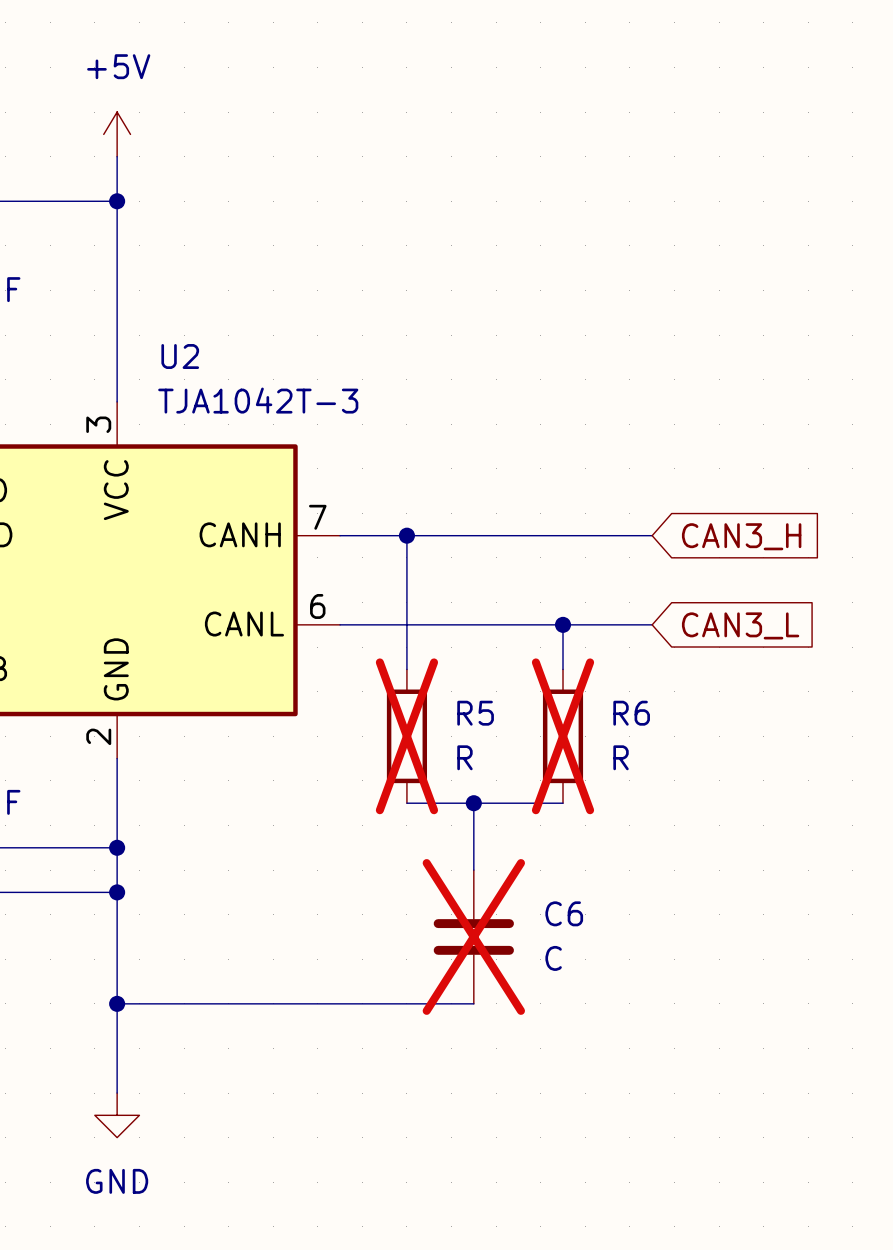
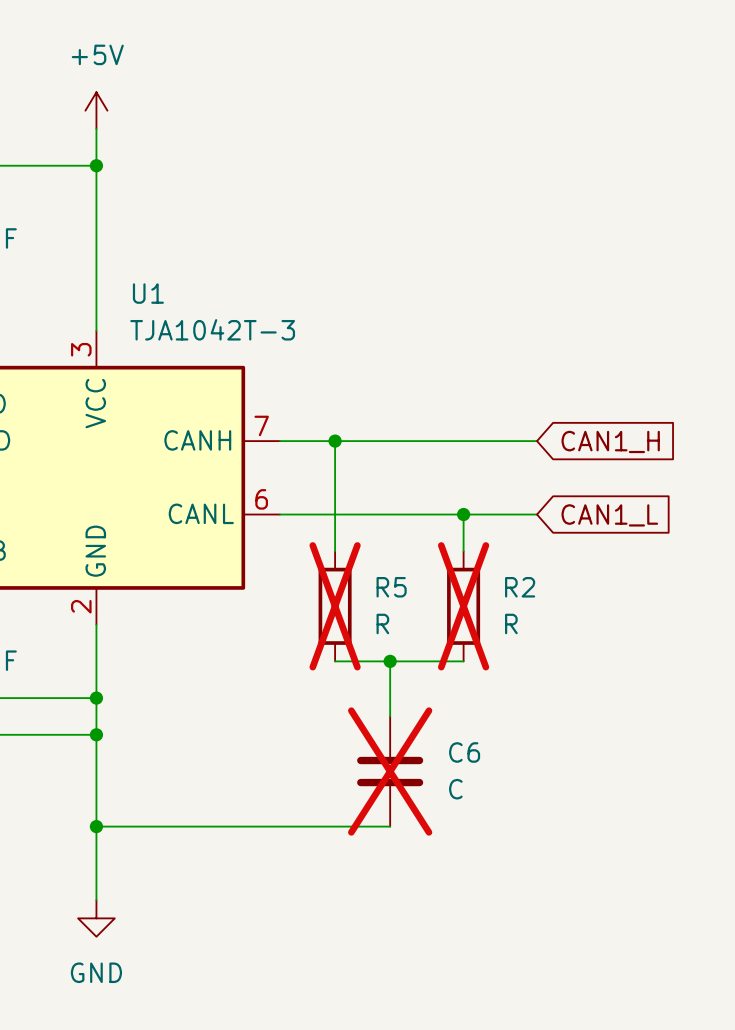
U2 name: U2 (180, 356) -> U1 (148, 293)
global label: CAN3_H (741, 536) -> CAN1_H (610, 441)
global label: CAN3_L (740, 625) -> CAN1_L (609, 515)
R6 name: R6 (631, 713) -> R2 (520, 587)

